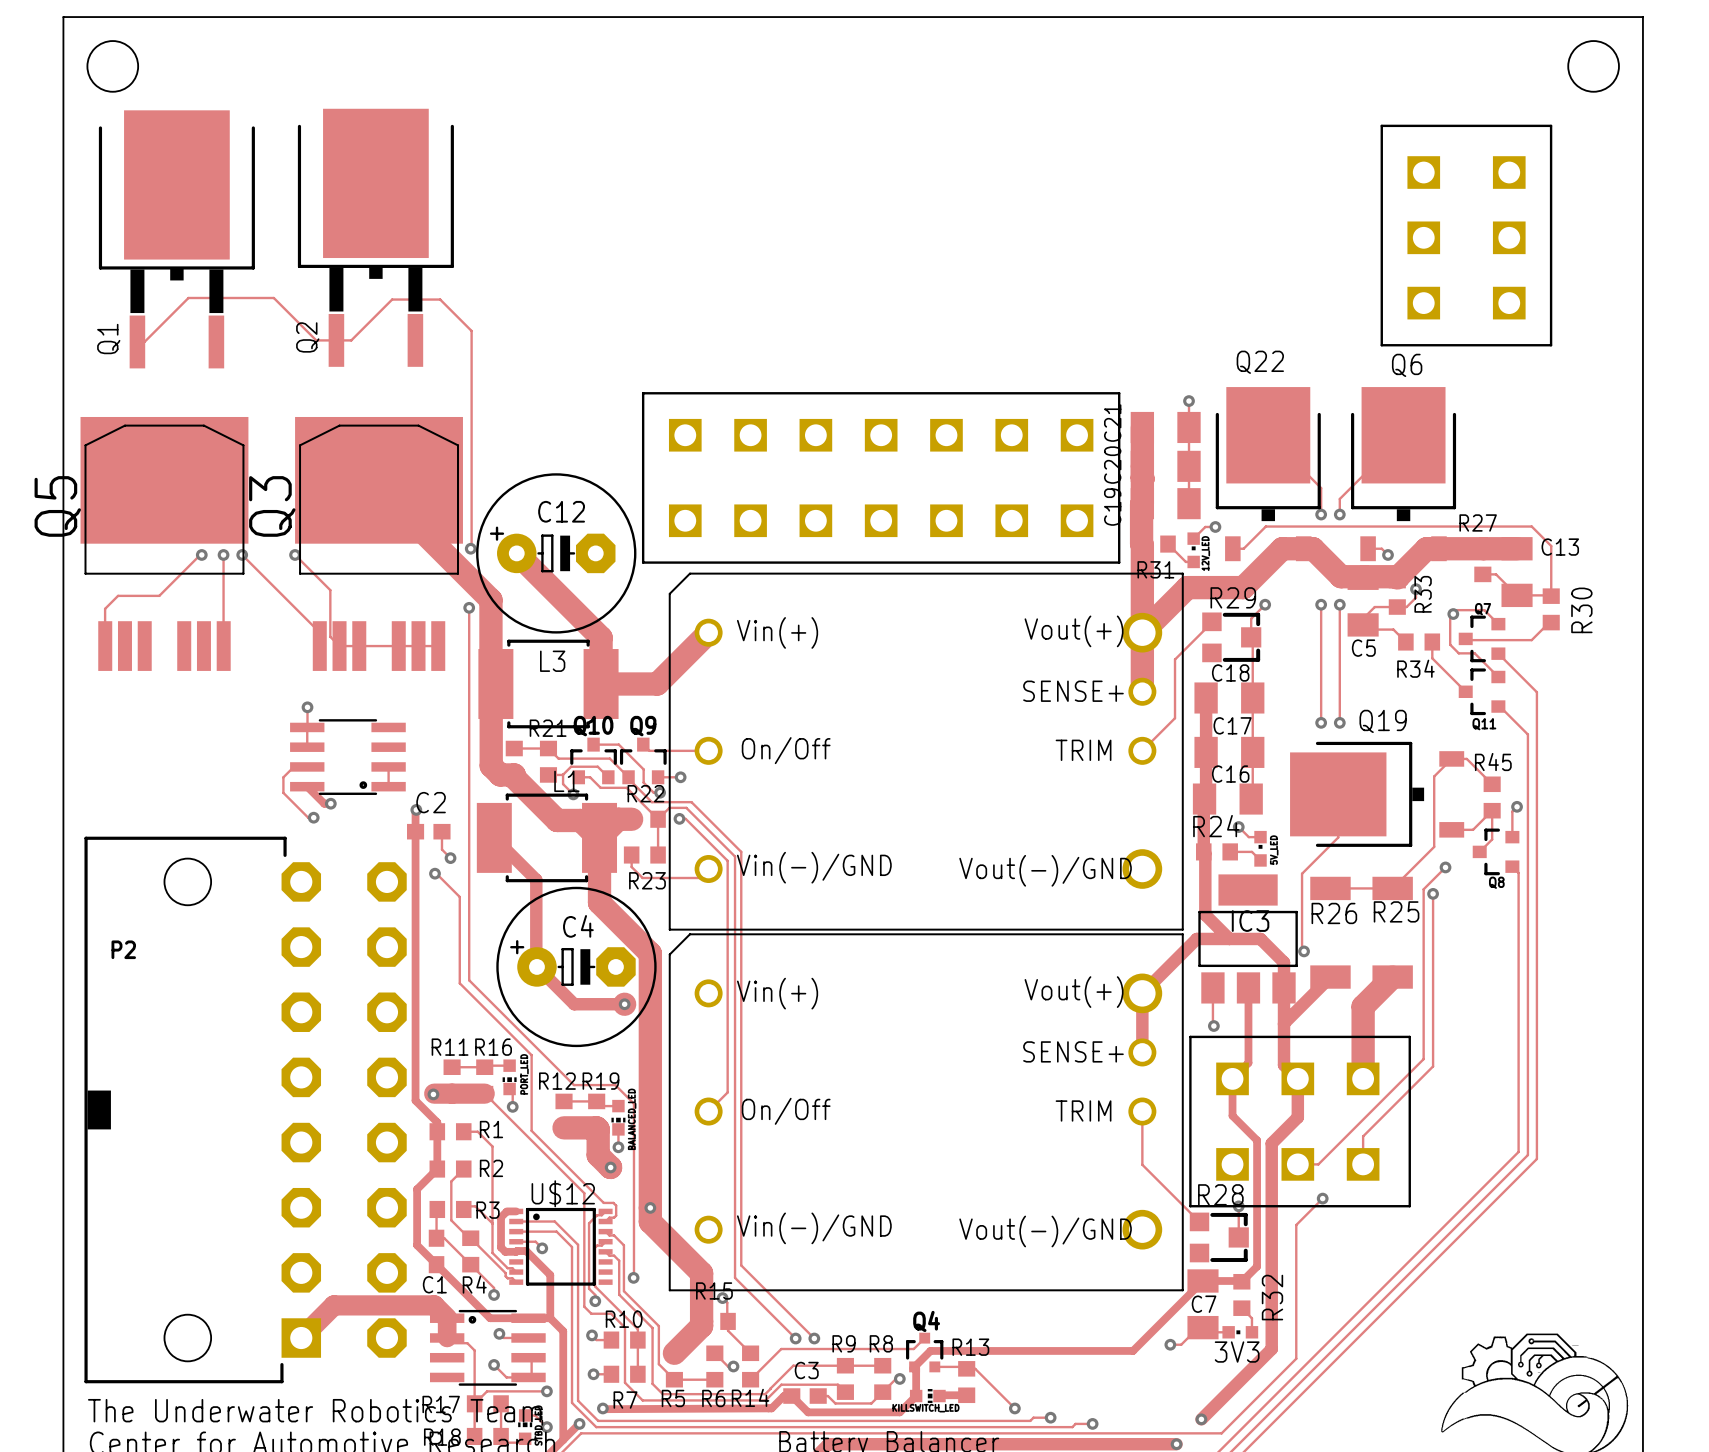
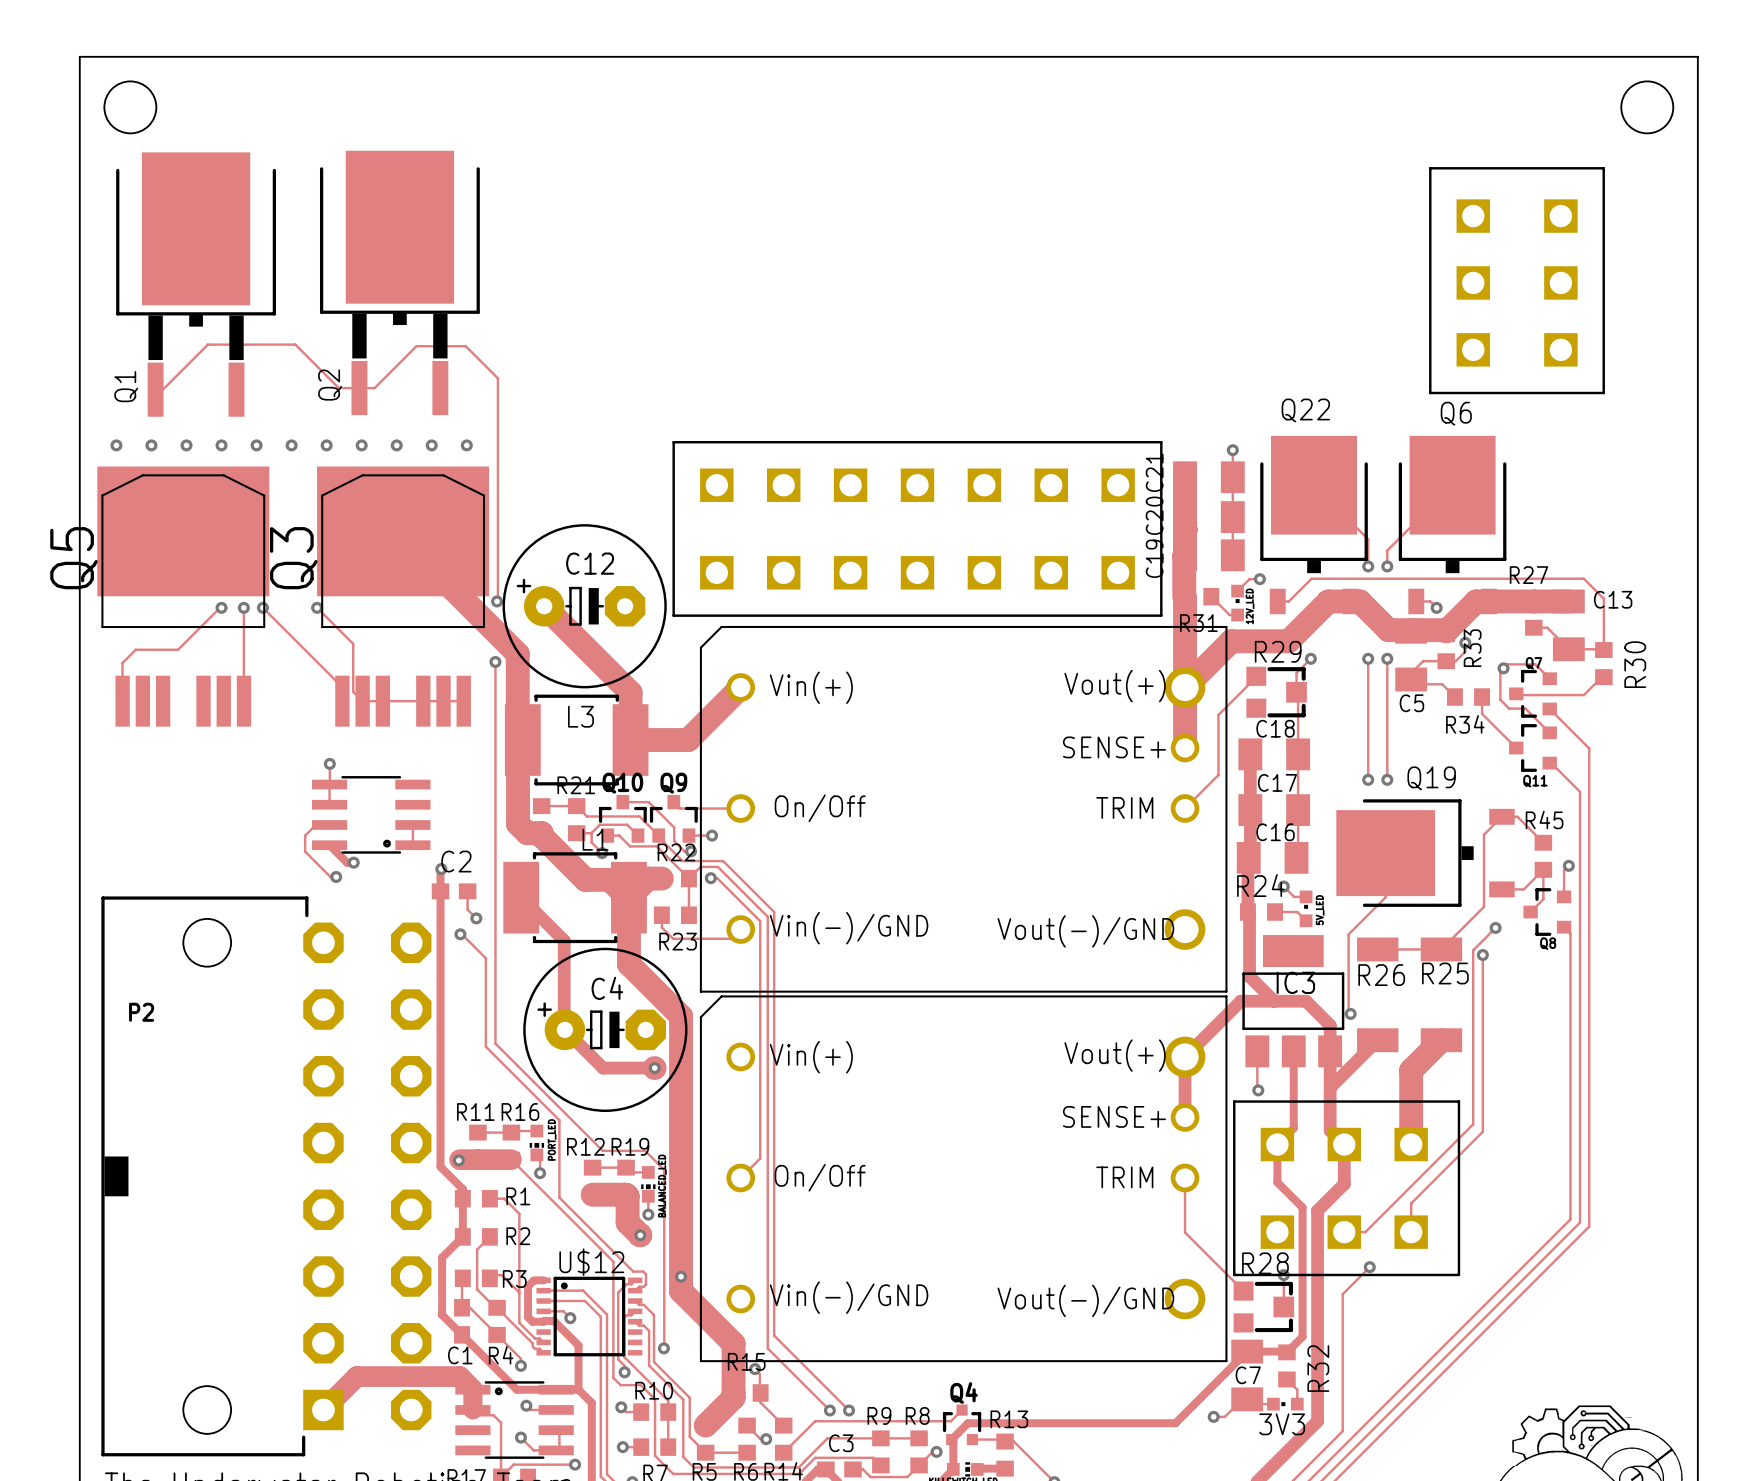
via: none -> (116, 445)
via: none -> (151, 445)
via: none -> (186, 445)
via: none -> (221, 445)
via: none -> (256, 445)
via: none -> (291, 445)
via: none -> (326, 445)
via: none -> (361, 445)
via: none -> (396, 445)
via: none -> (431, 445)
via: none -> (466, 445)

